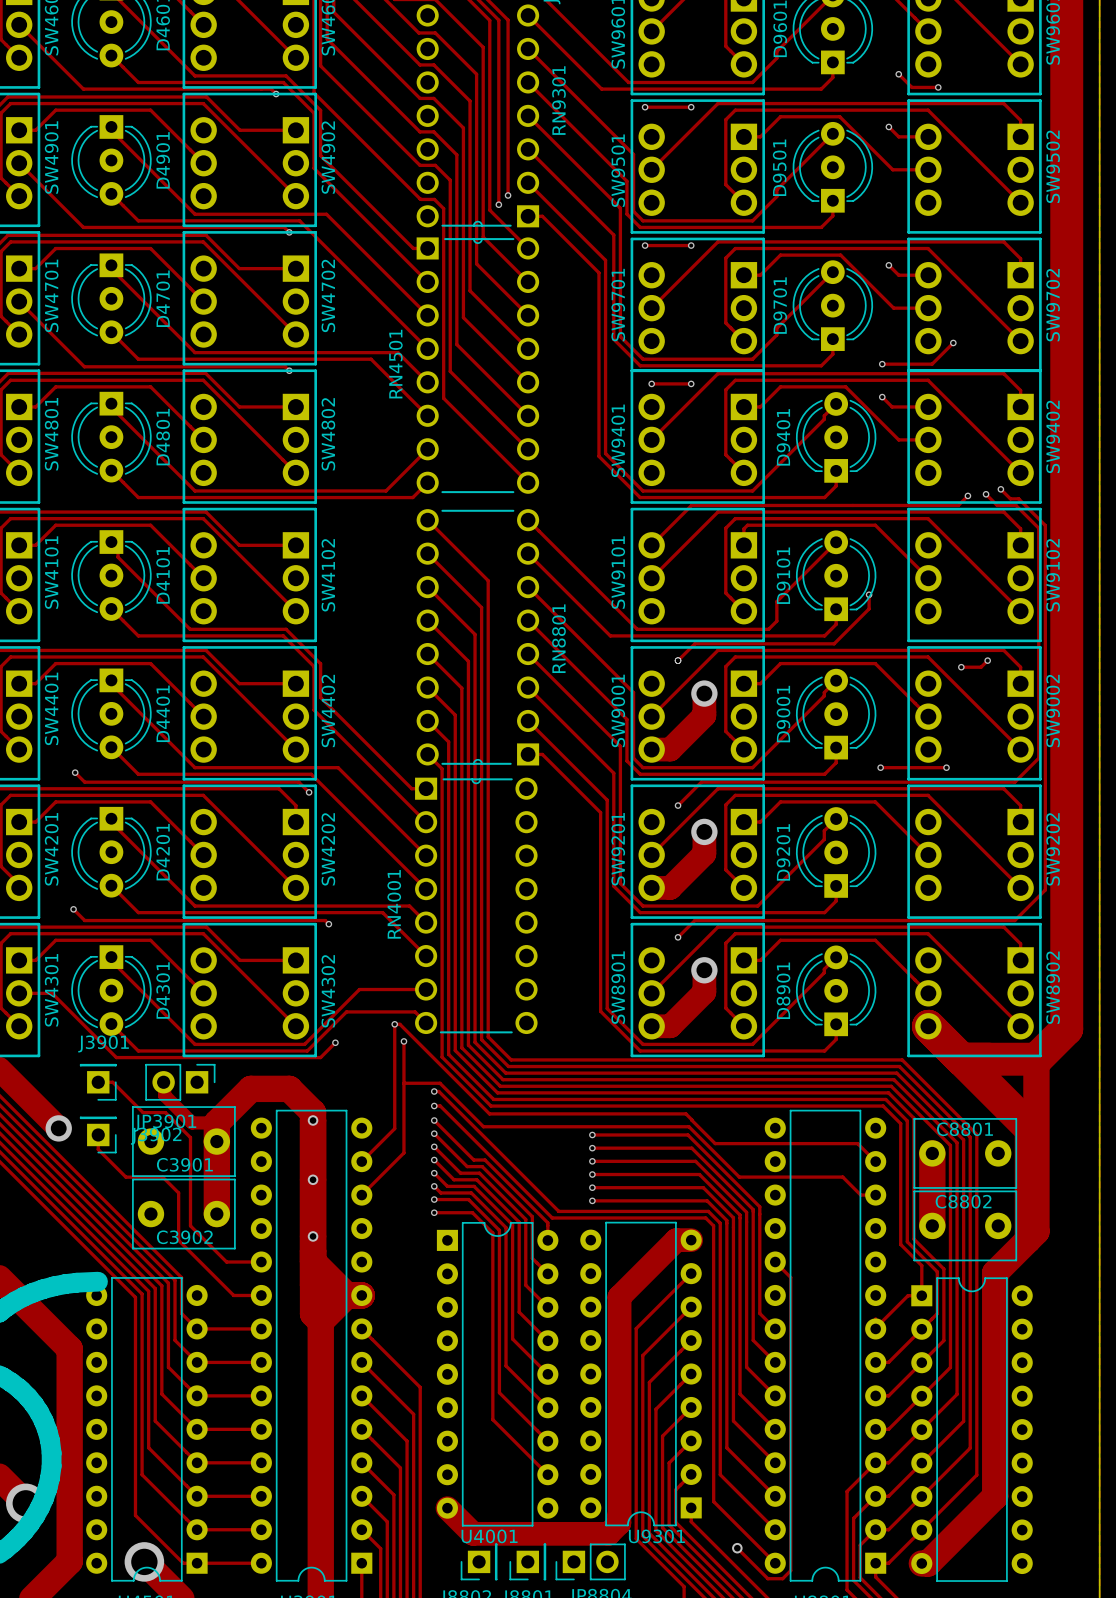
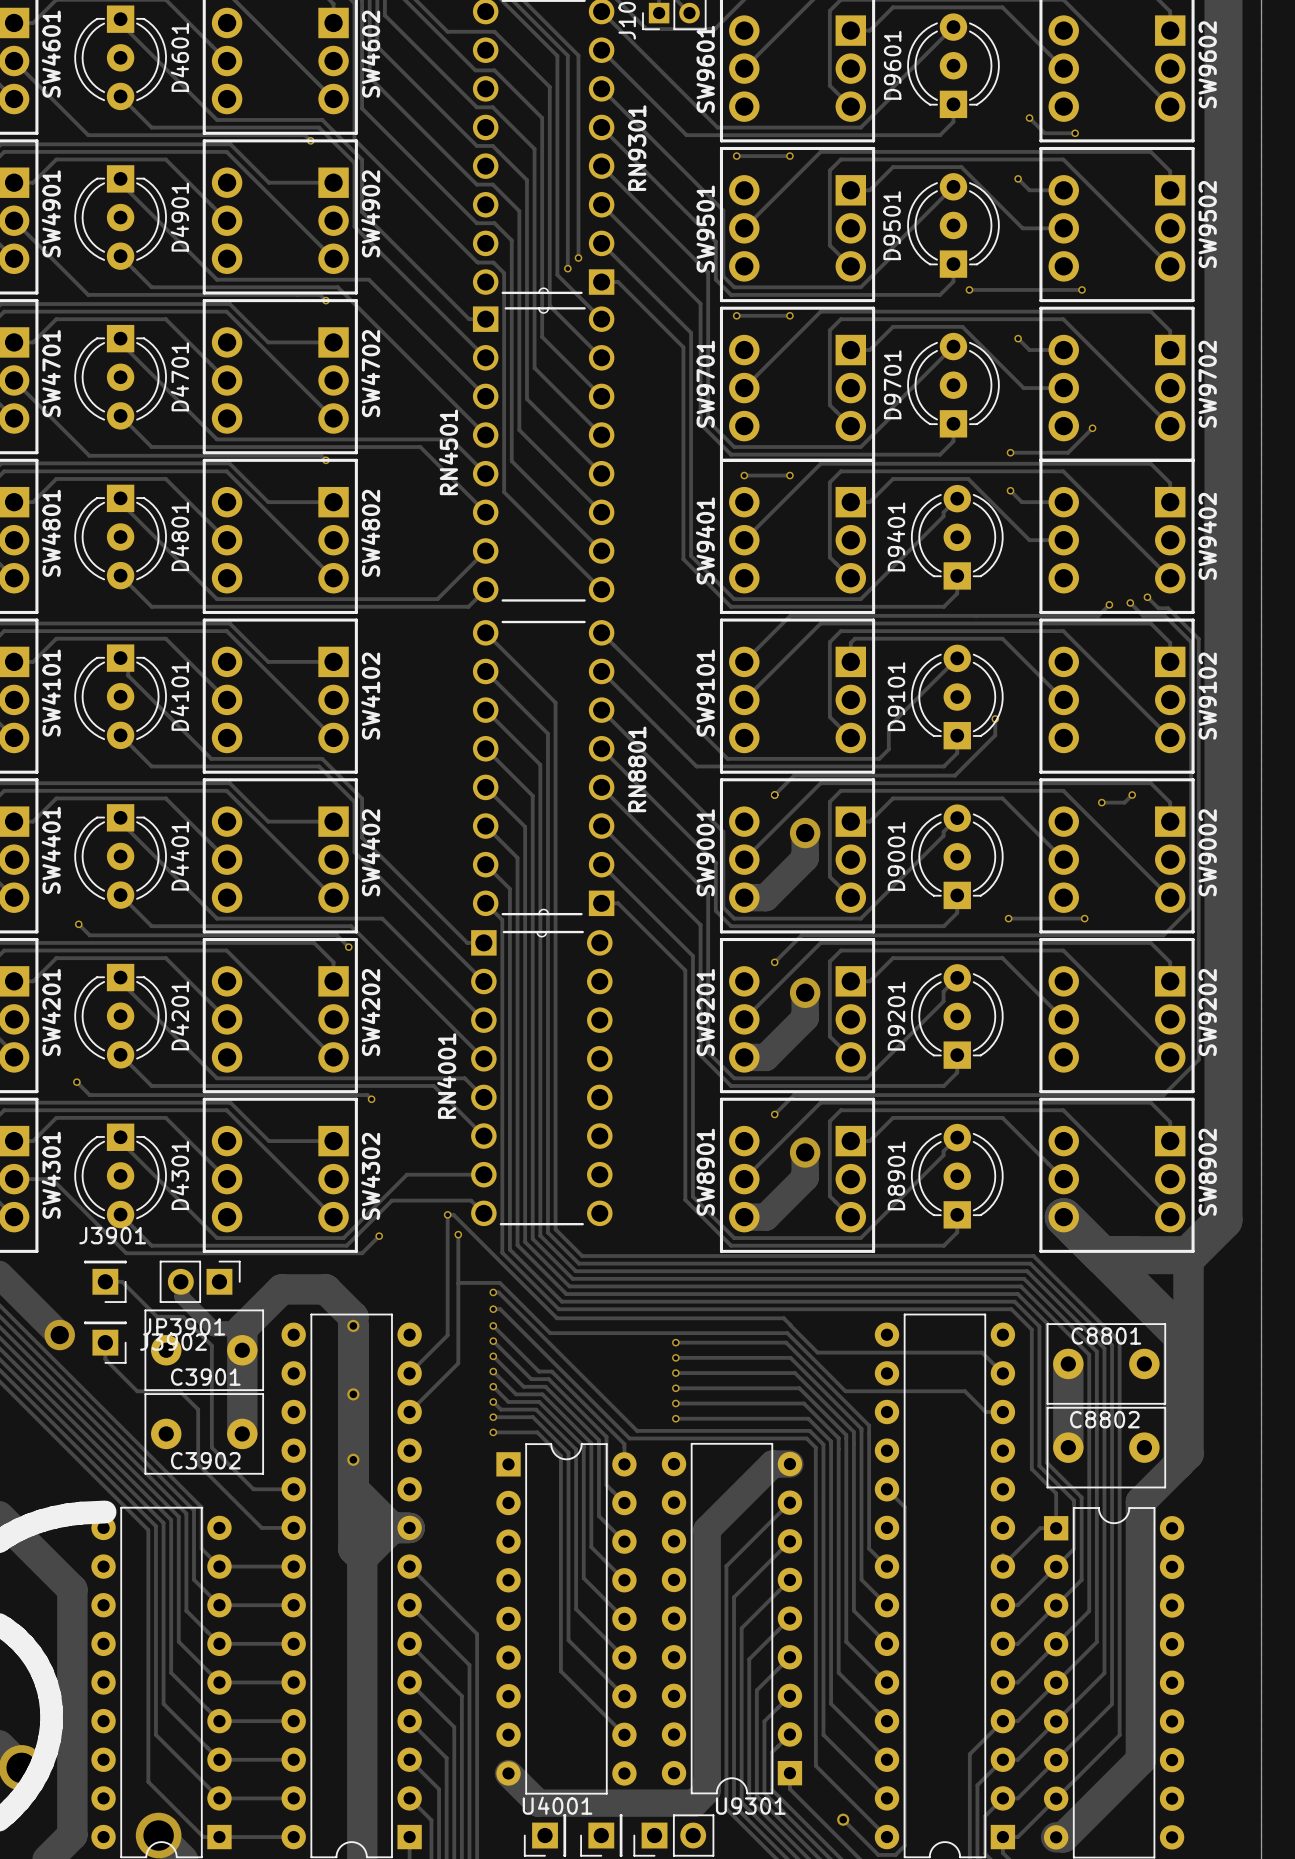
track: none -> (969, 289) (1082, 289)
via: none -> (969, 289)
via: none -> (1082, 289)

